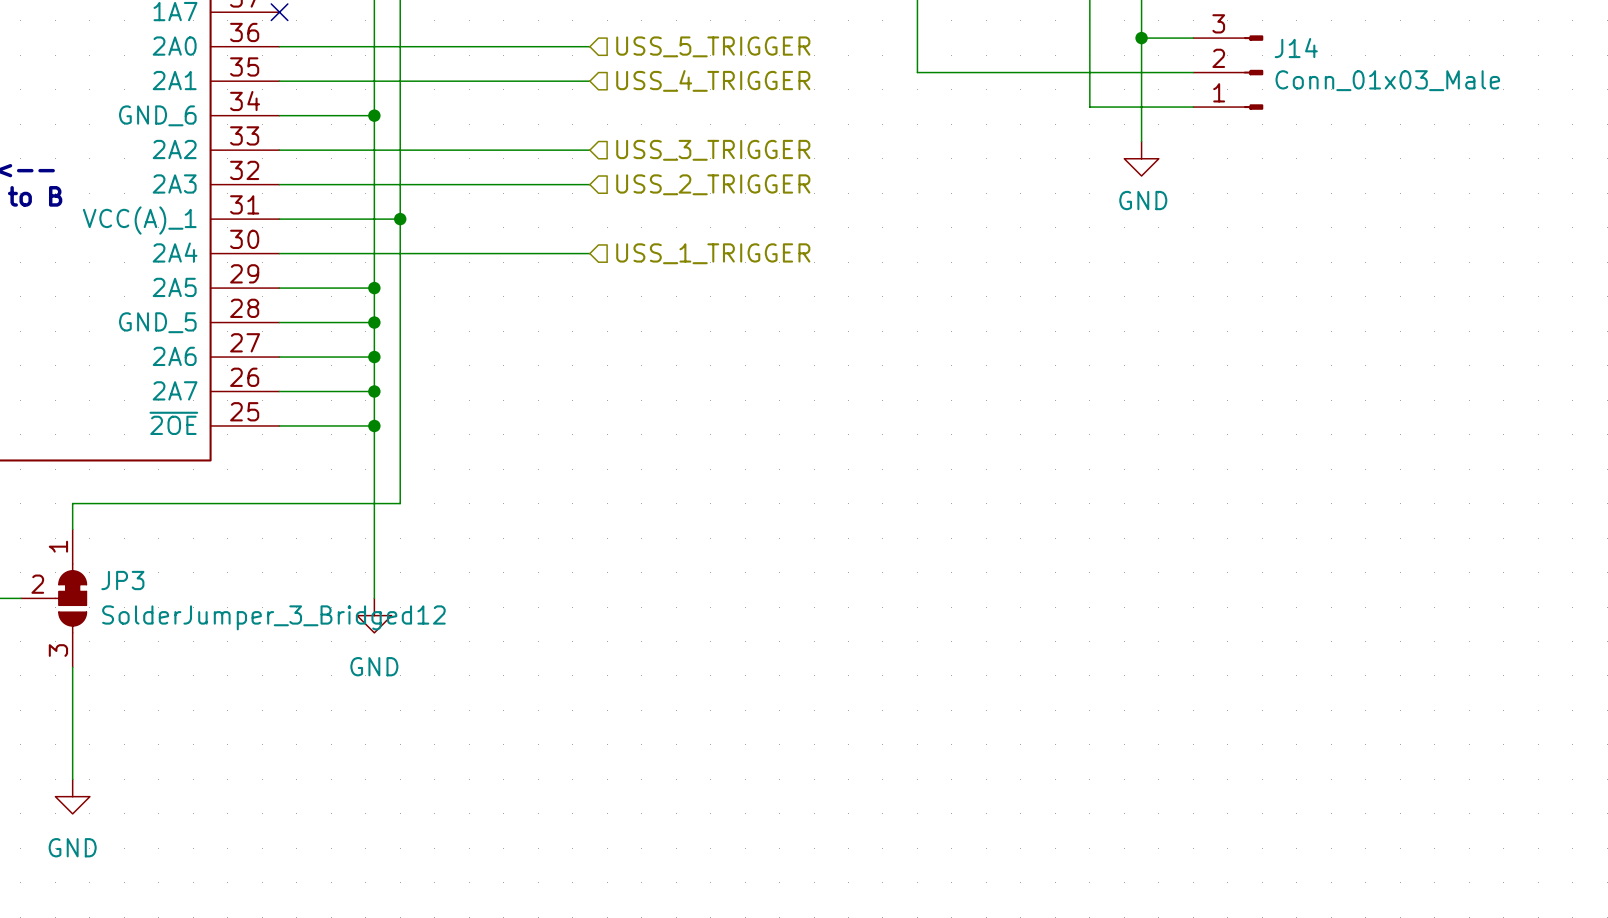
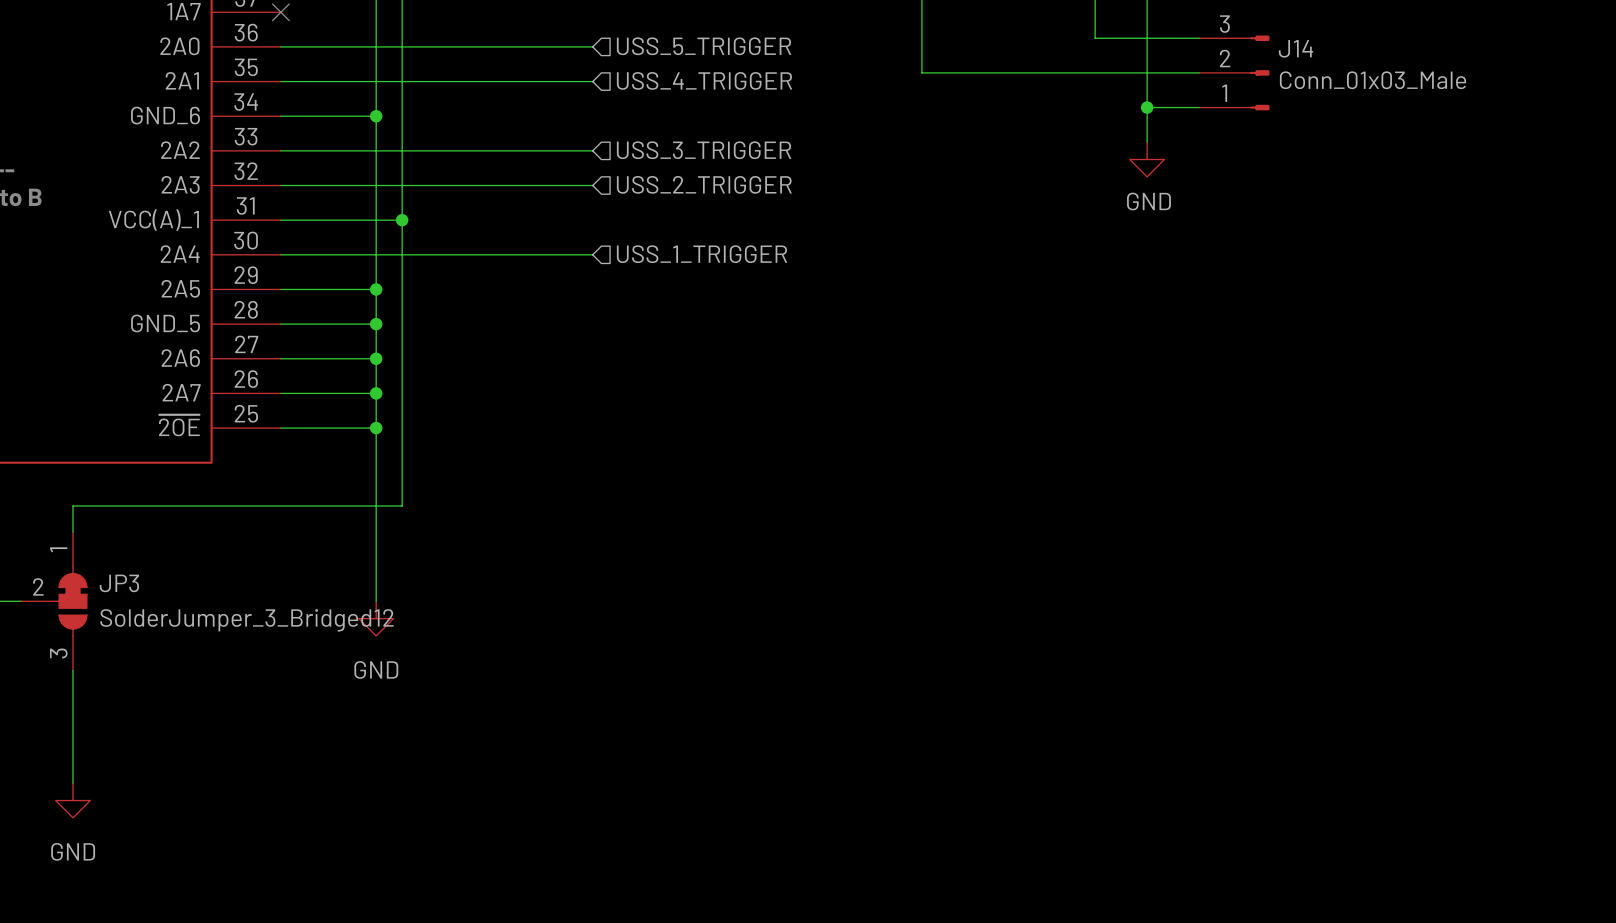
wire: (1089, 38) (1089, 107) (1141, 107) -> (1095, 38) (1147, 38)
junction: (1141, 38) -> none
junction: none -> (1147, 107)

